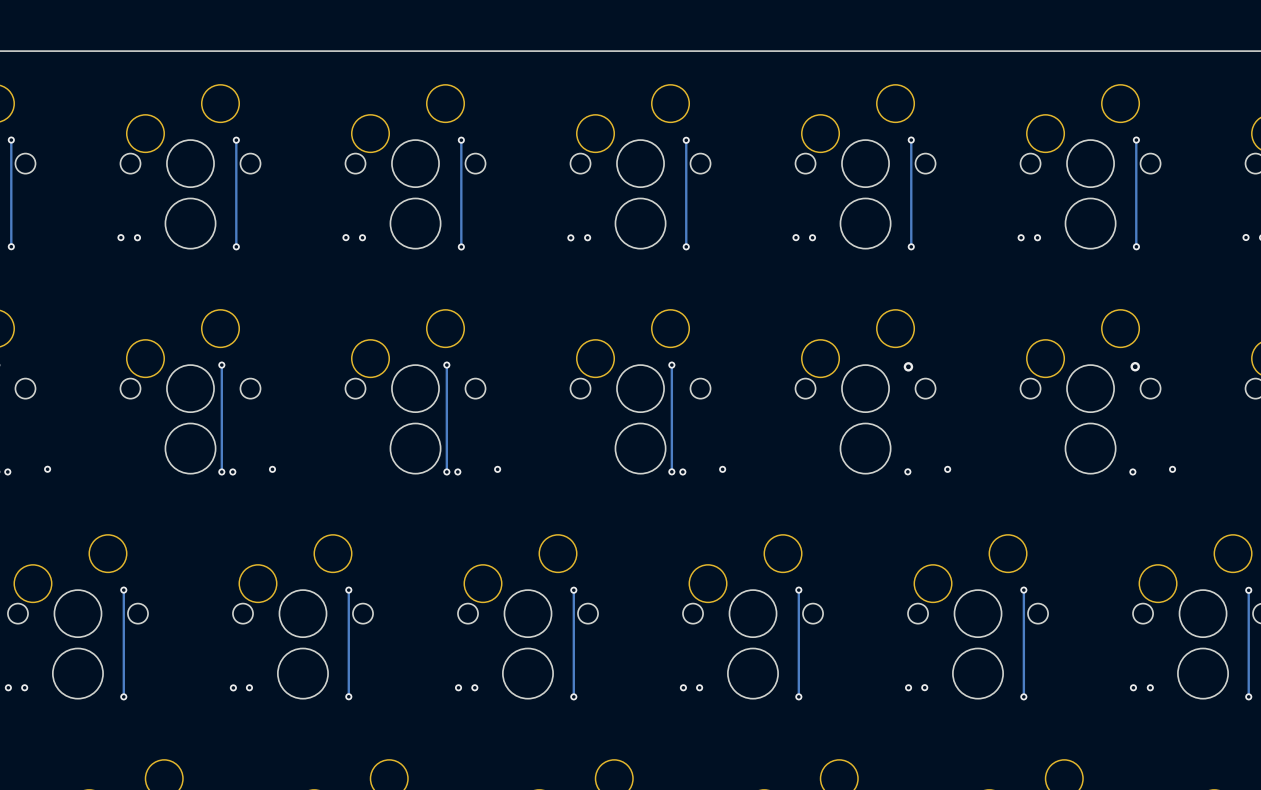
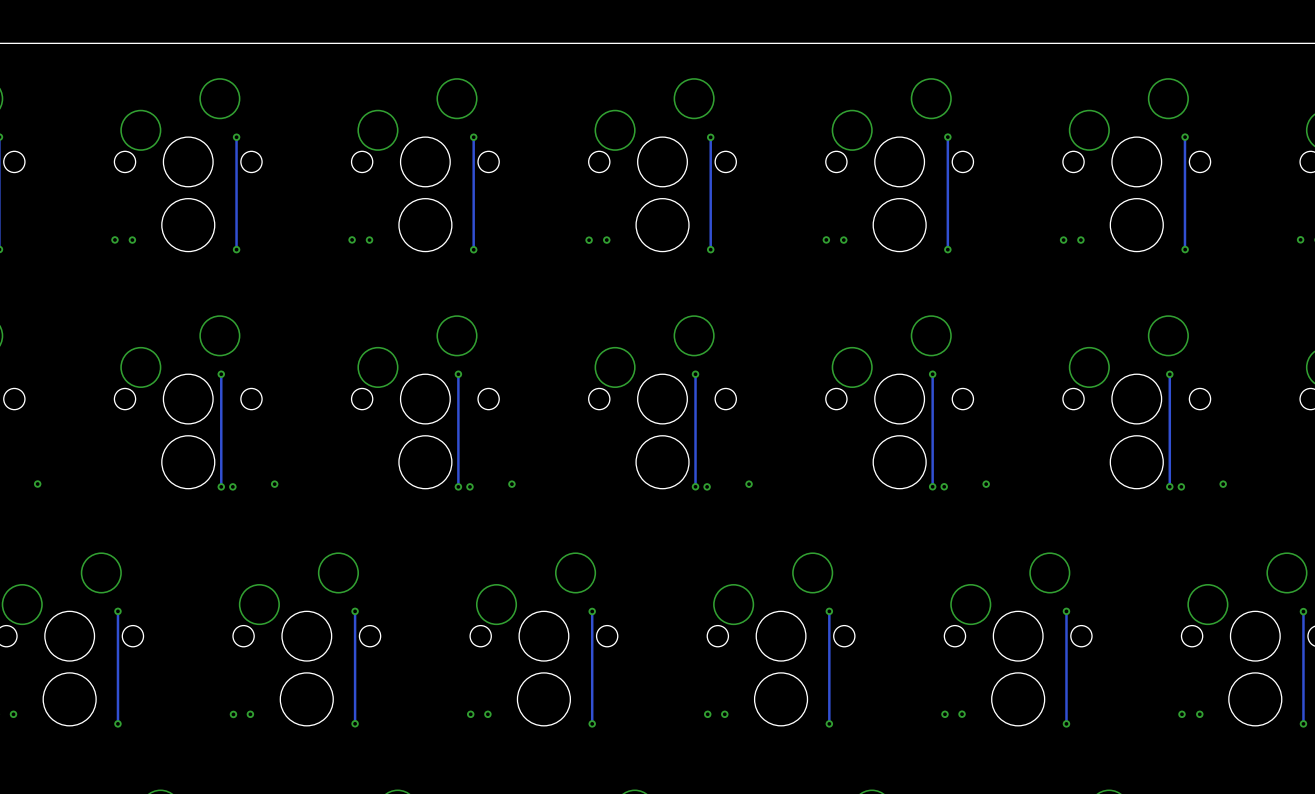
track: none -> (932, 374) (932, 486)
via: none -> (932, 374)
track: none -> (1169, 374) (1169, 486)
via: none -> (1169, 374)
via: (908, 366) -> none
via: (1135, 366) -> none
via: none -> (932, 486)
via: none -> (1169, 486)

